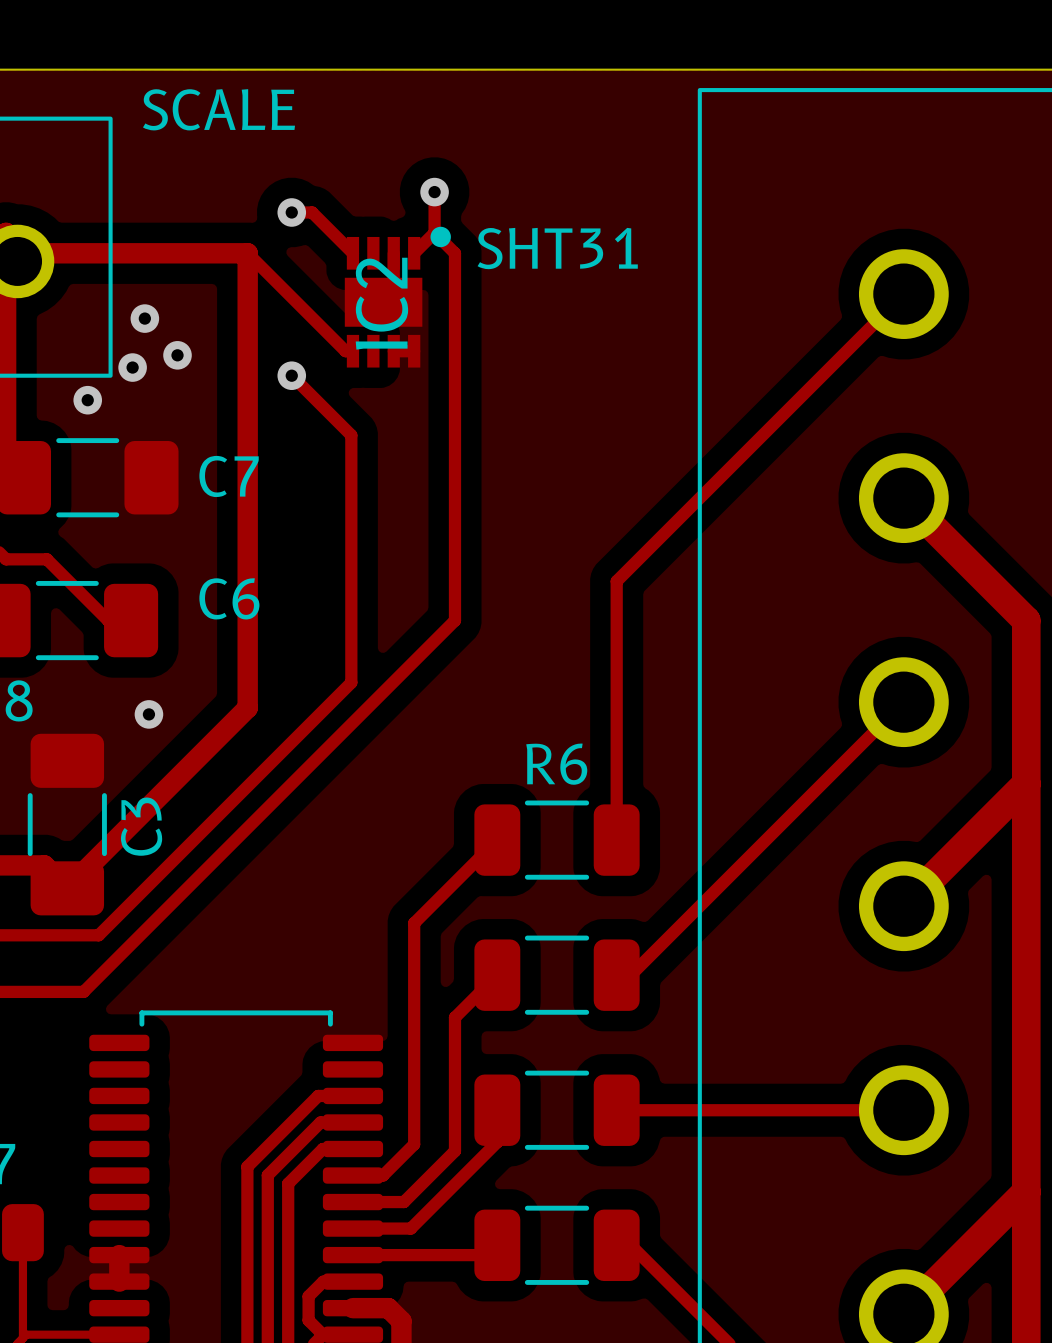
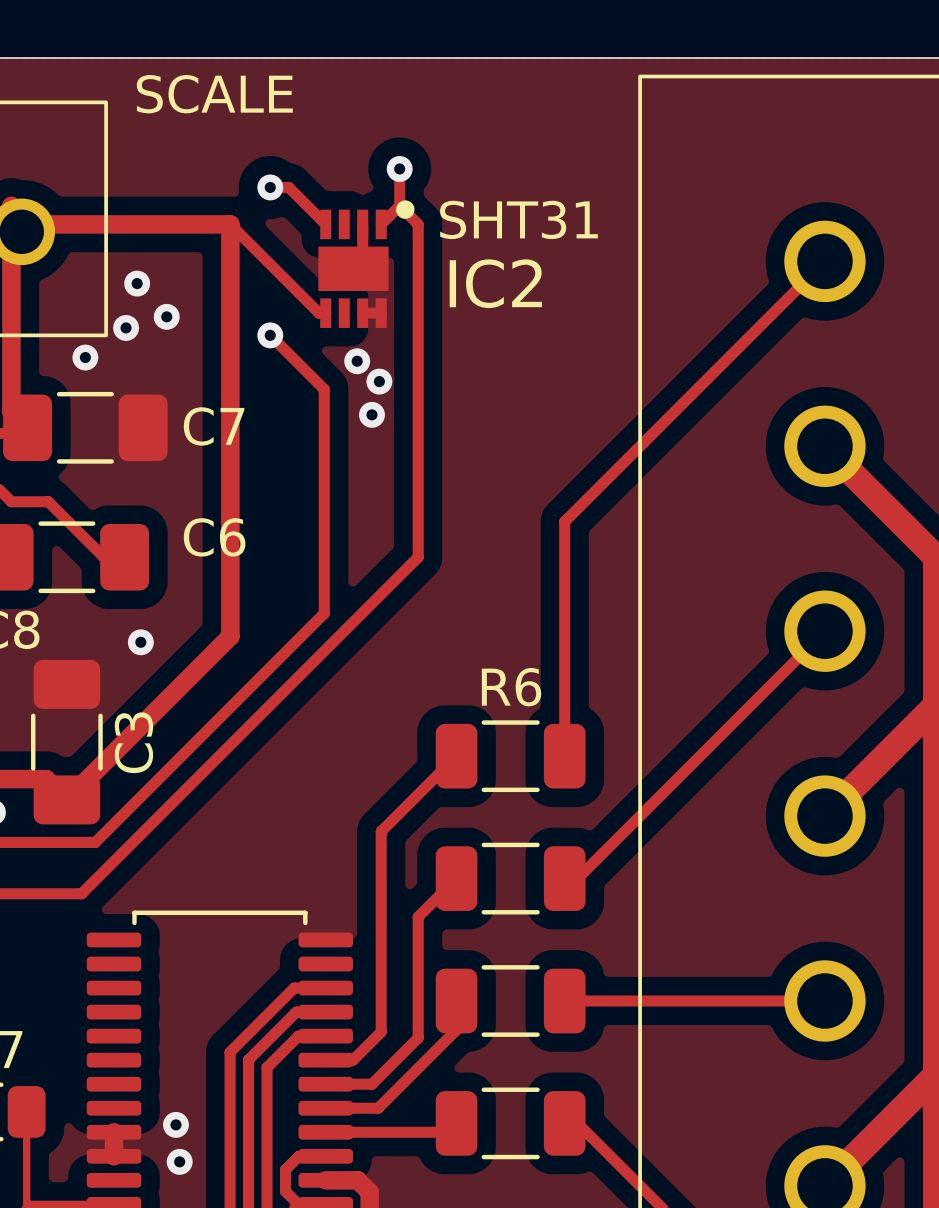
IC2 name rotation: 0° (381, 303) -> 90° clockwise (495, 283)
via: none -> (357, 361)
via: none -> (379, 381)
via: none -> (371, 414)
via: none -> (175, 1124)
via: none -> (179, 1161)

